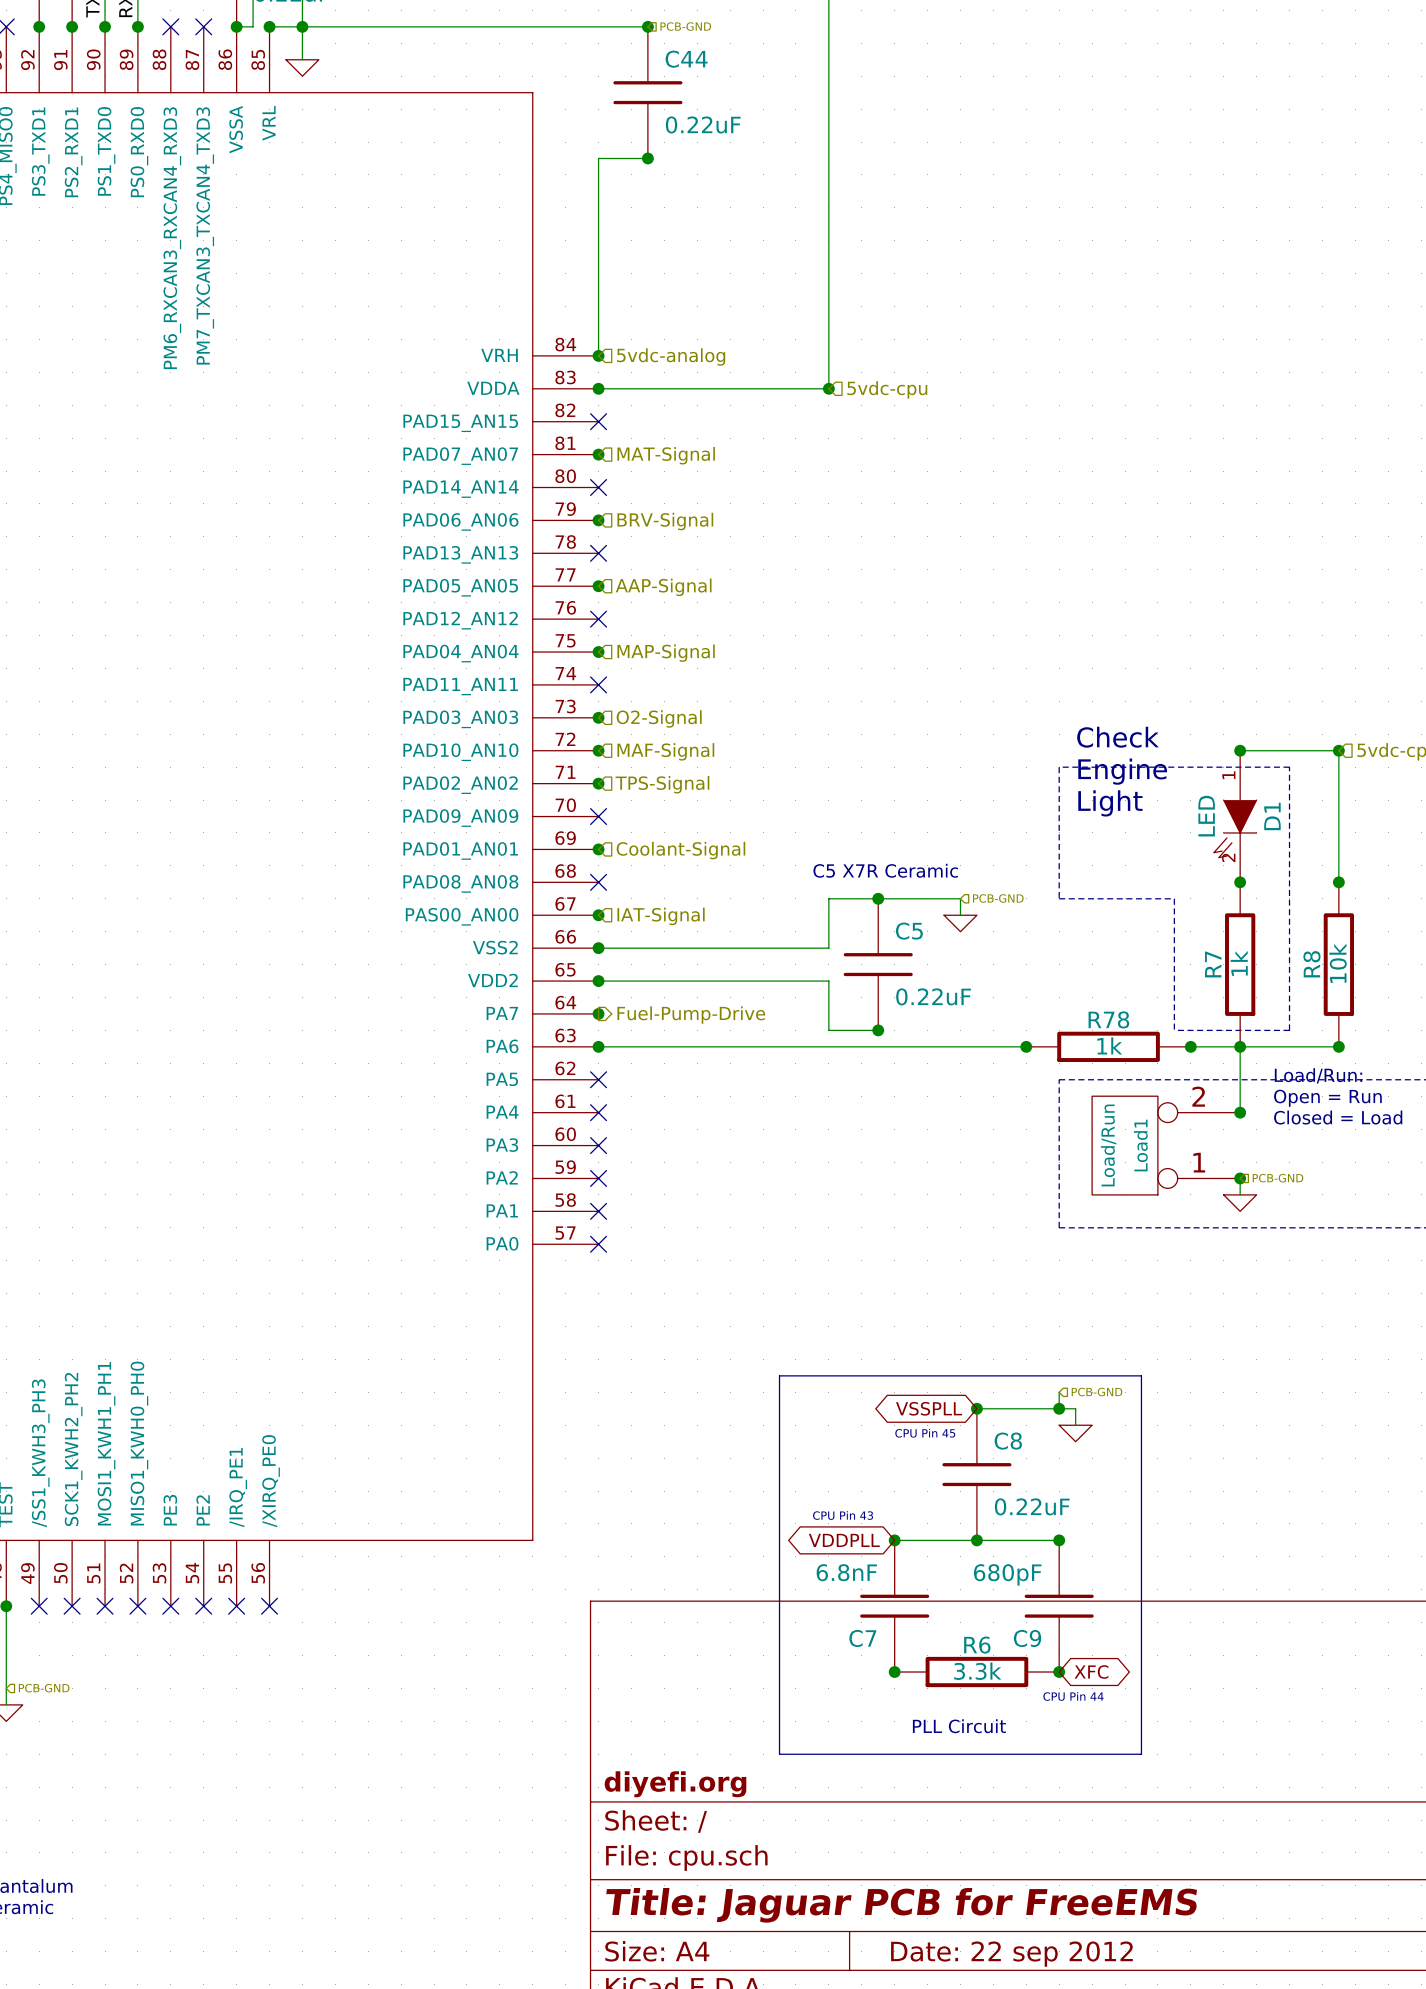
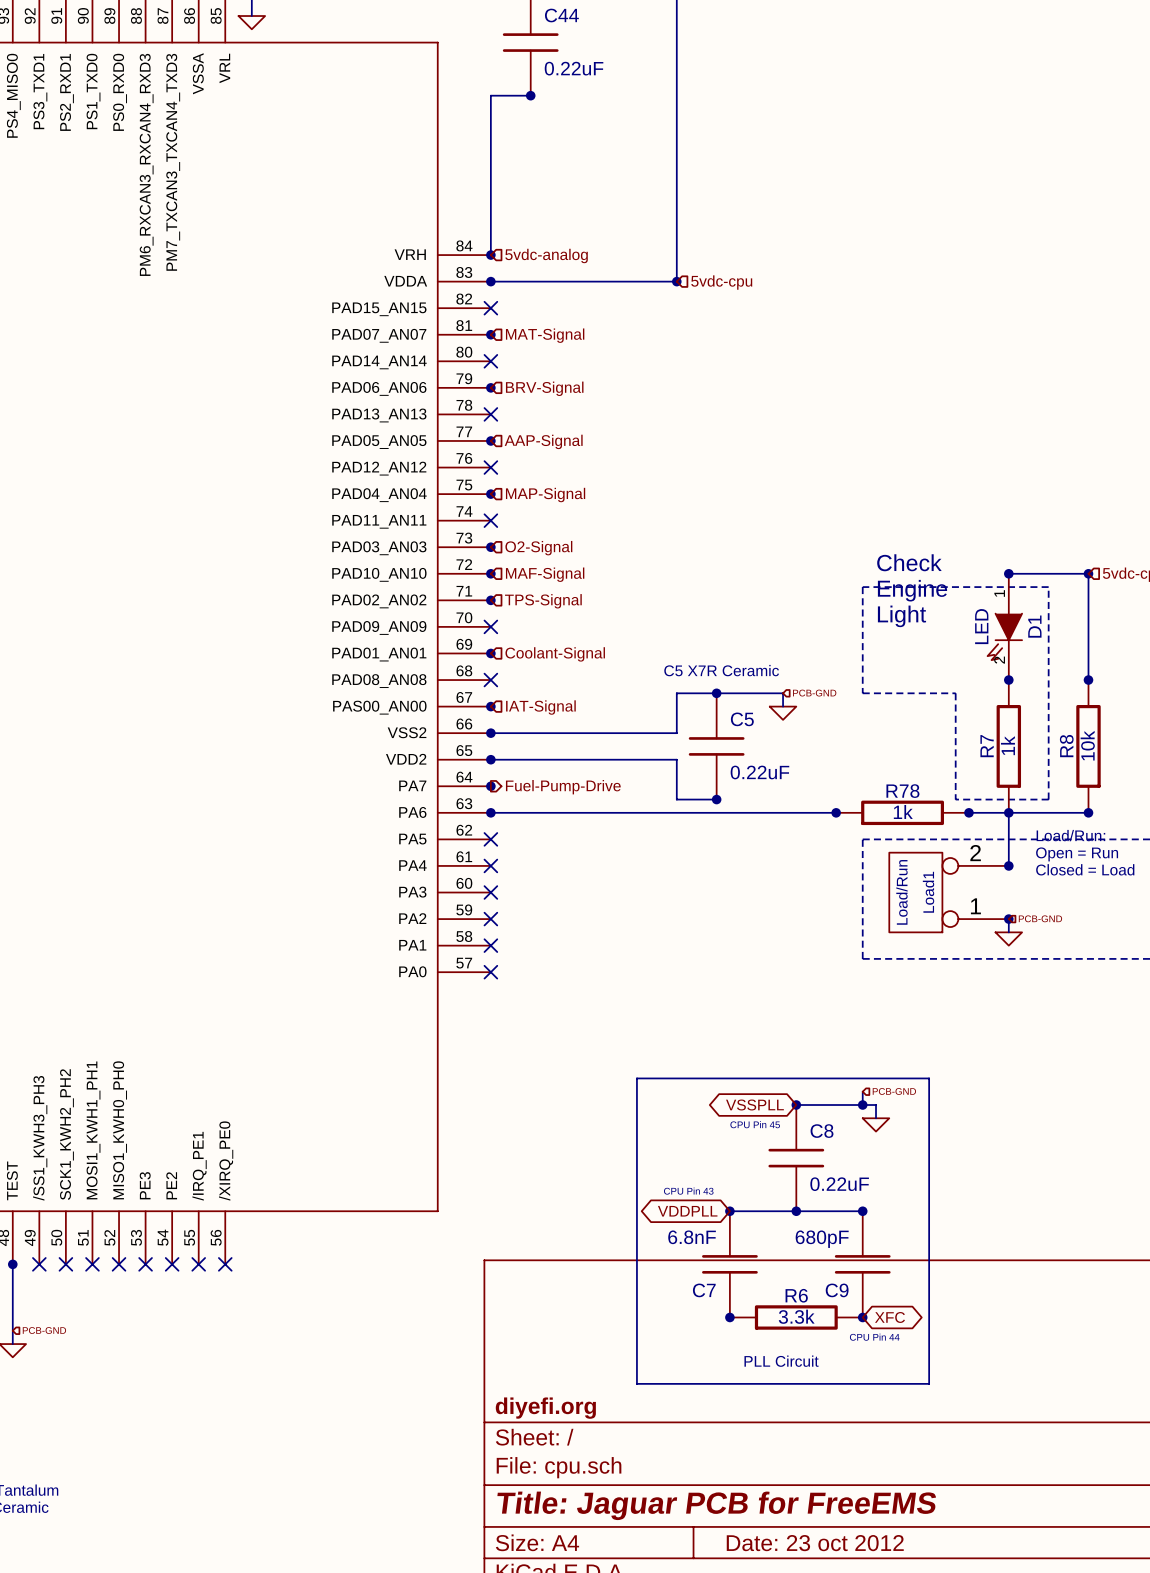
title block: Date: 22 sep 2012 (1011, 1954) -> Date: 23 oct 2012 (815, 1543)

